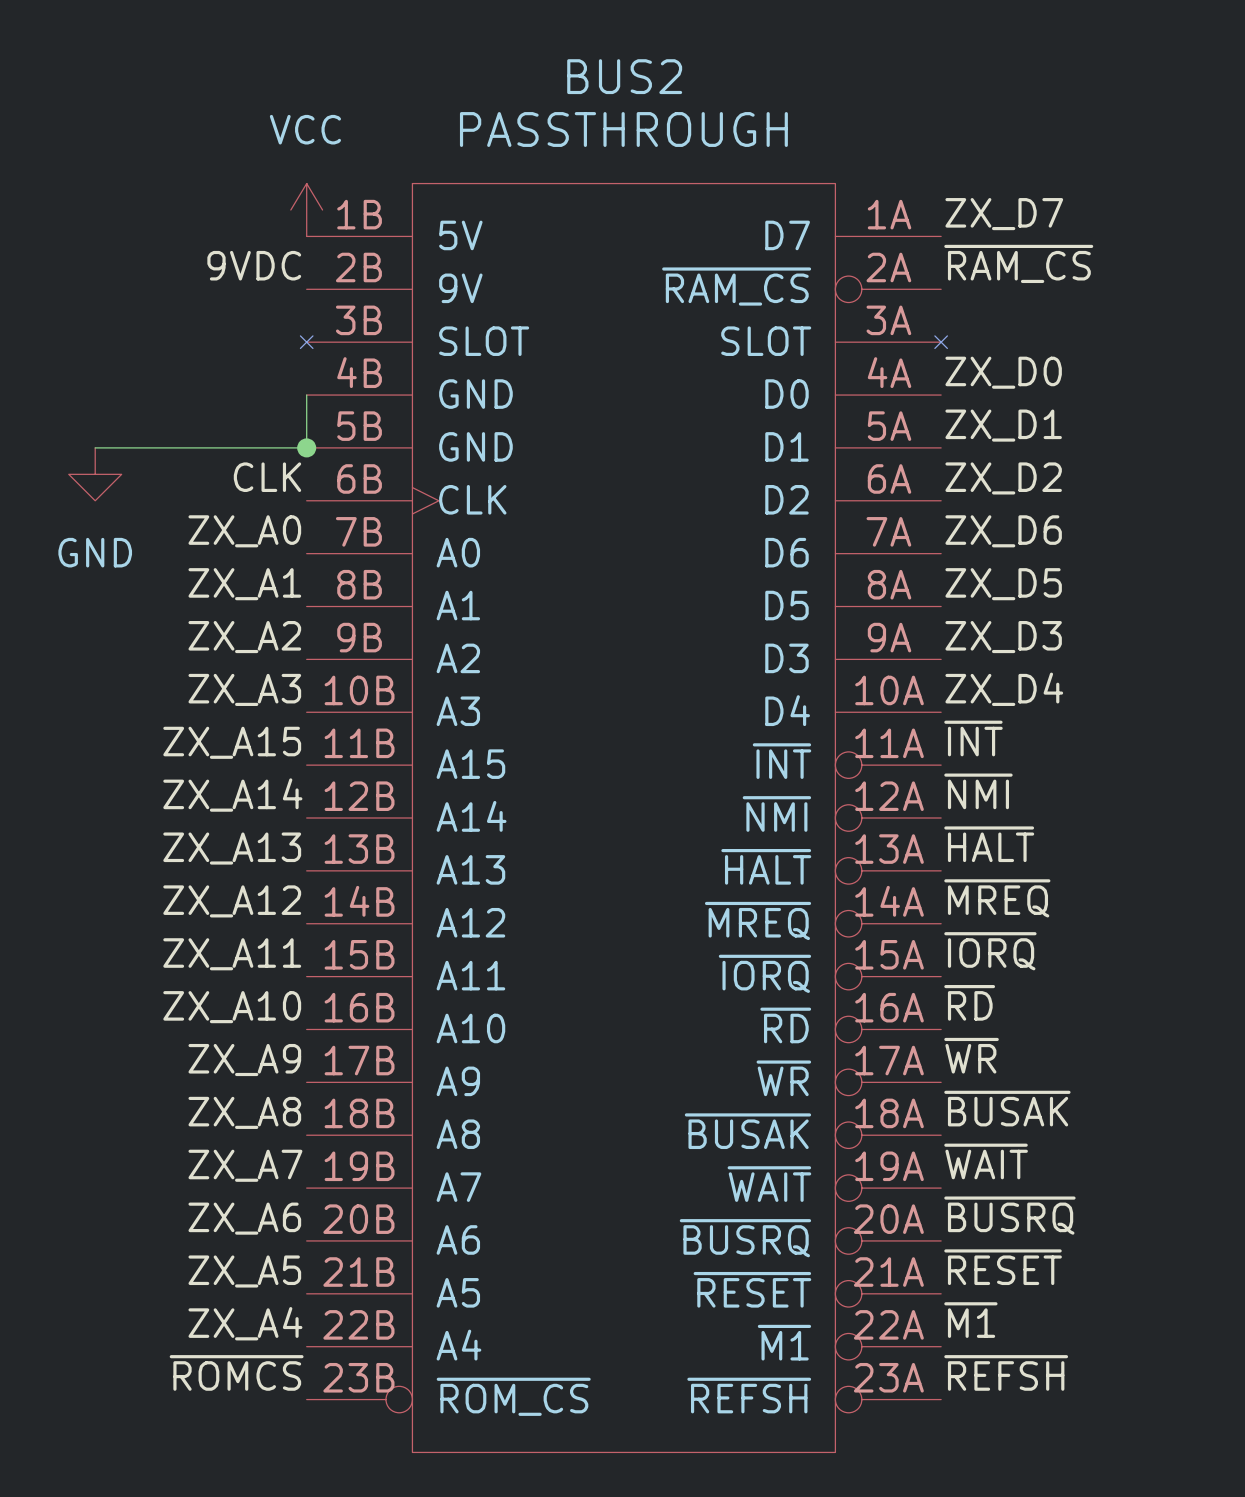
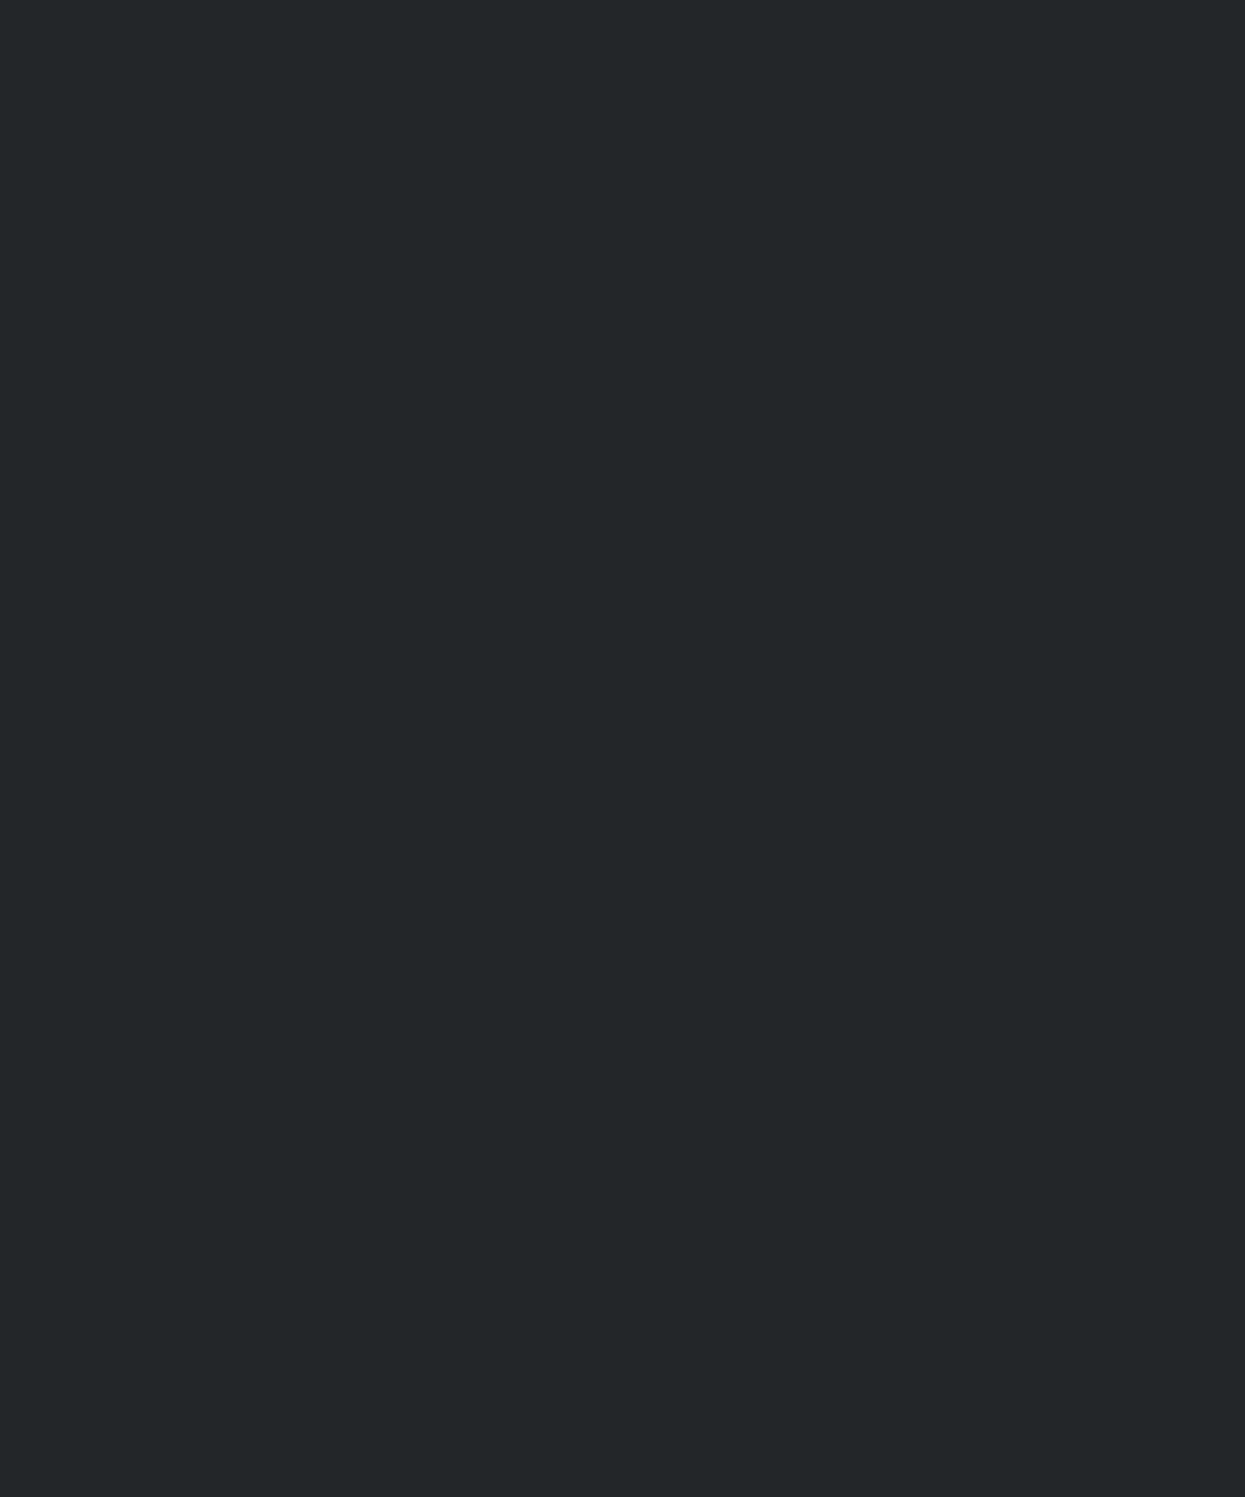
power symbol: VCC (306, 209) -> none
label: ZX_D7 (1004, 214) -> none
label: ~{RAM_CS} (1018, 263) -> none
label: 9VDC (254, 265) -> none
label: ZX_D0 (1003, 372) -> none
wire: (306, 395) (306, 447) (95, 447) -> none
label: ZX_D1 (1003, 425) -> none
junction: (306, 447) -> none
power symbol: GND (95, 474) -> none
label: CLK (267, 477) -> none
label: ZX_D2 (1003, 478) -> none
label: ZX_A0 (244, 531) -> none
label: ZX_D6 (1003, 531) -> none
label: ZX_A1 (244, 584) -> none
label: ZX_D5 (1003, 584) -> none
label: ZX_A2 (244, 637) -> none
label: ZX_D3 (1003, 637) -> none
label: ZX_A3 (244, 689) -> none
label: ZX_D4 (1004, 689) -> none
label: ~{INT} (973, 738) -> none
label: ZX_A15 (232, 742) -> none
label: ~{NMI} (978, 791) -> none
label: ZX_A14 (232, 795) -> none
BUS2: PASSTHROUGH (623, 818) -> none
label: ~{HALT} (989, 844) -> none
label: ZX_A13 (232, 848) -> none
label: ~{MREQ} (997, 898) -> none
label: ZX_A12 (232, 901) -> none
label: ~{IORQ} (990, 951) -> none
label: ZX_A11 (232, 954) -> none
label: ~{RD} (969, 1002) -> none
label: ZX_A10 (232, 1007) -> none
label: ~{WR} (971, 1055) -> none
label: ZX_A9 (244, 1060) -> none
label: ~{BUSAK} (1007, 1108) -> none
label: ZX_A8 (244, 1112) -> none
label: ~{WAIT} (986, 1161) -> none
label: ZX_A7 (245, 1165) -> none
label: ~{BUSRQ} (1009, 1215) -> none
label: ZX_A6 (244, 1218) -> none
label: ~{RESET} (1003, 1267) -> none
label: ZX_A5 (244, 1271) -> none
label: ~{M1} (970, 1320) -> none
label: ZX_A4 (245, 1323) -> none
label: ~{ROMCS} (236, 1372) -> none
label: ~{REFSH} (1006, 1372) -> none

